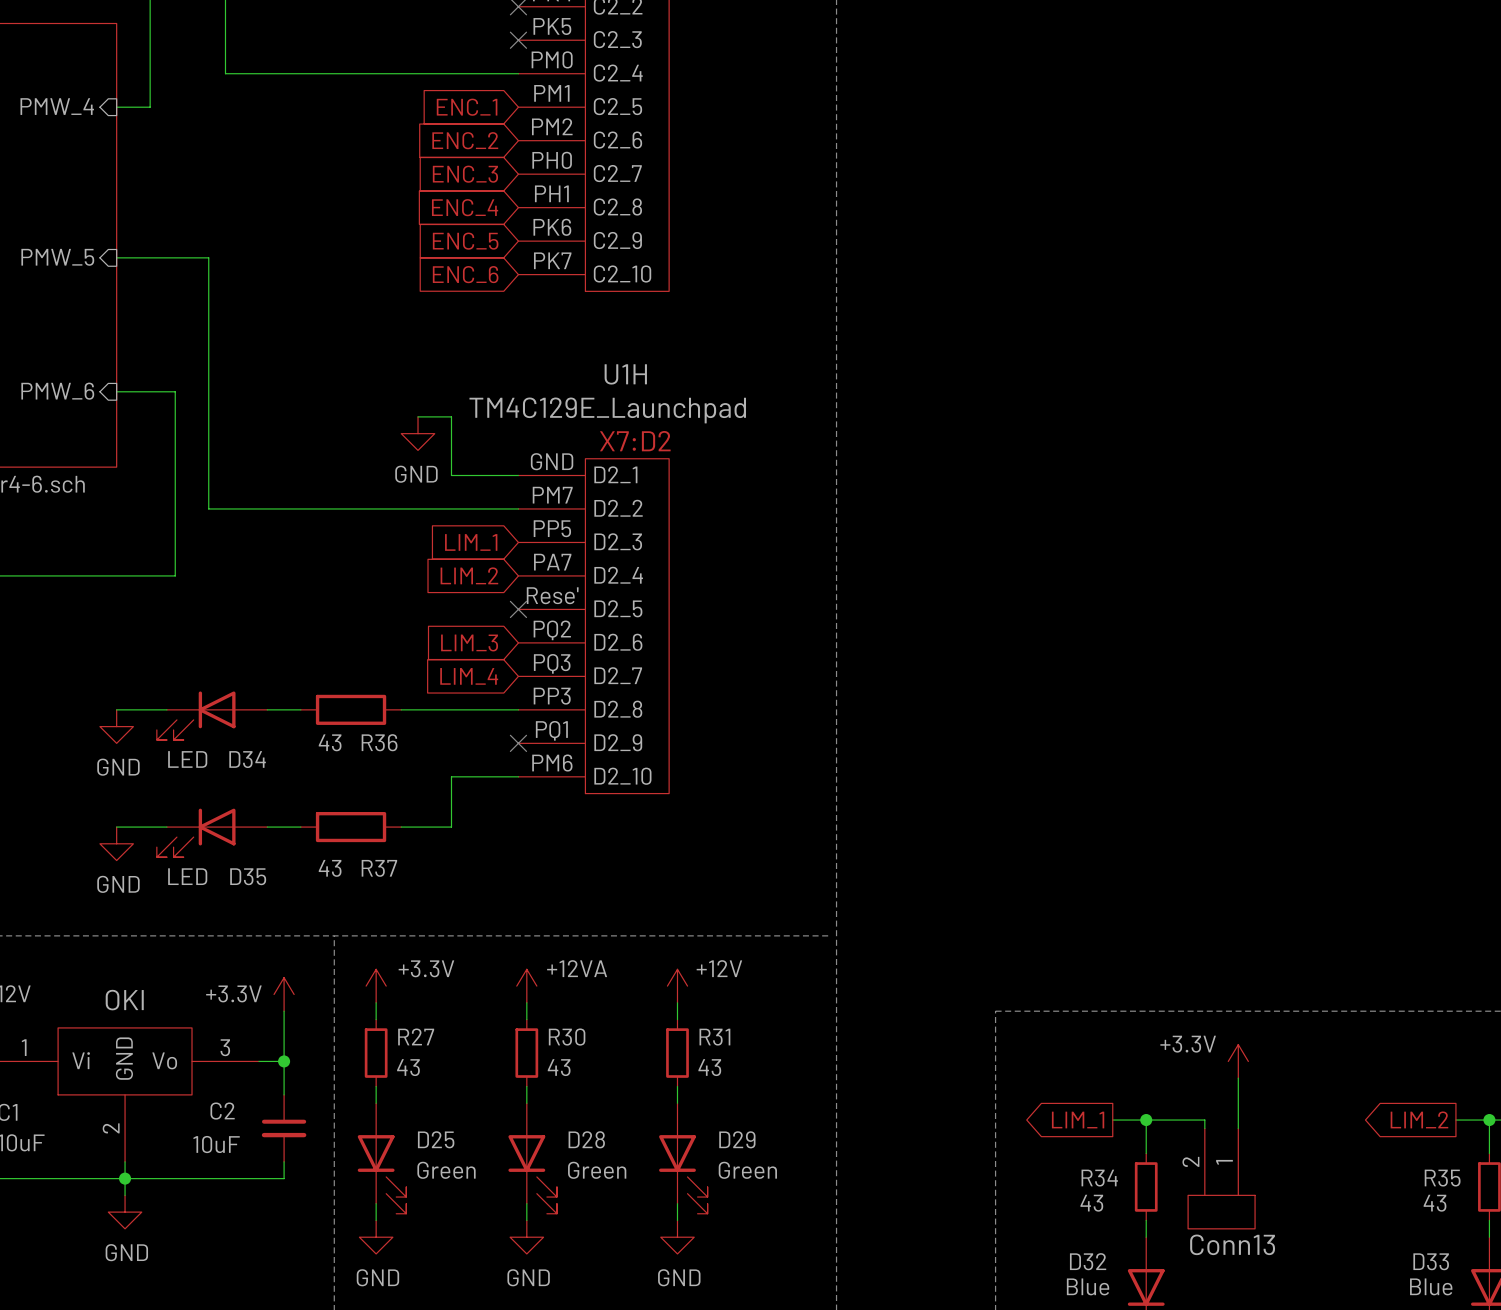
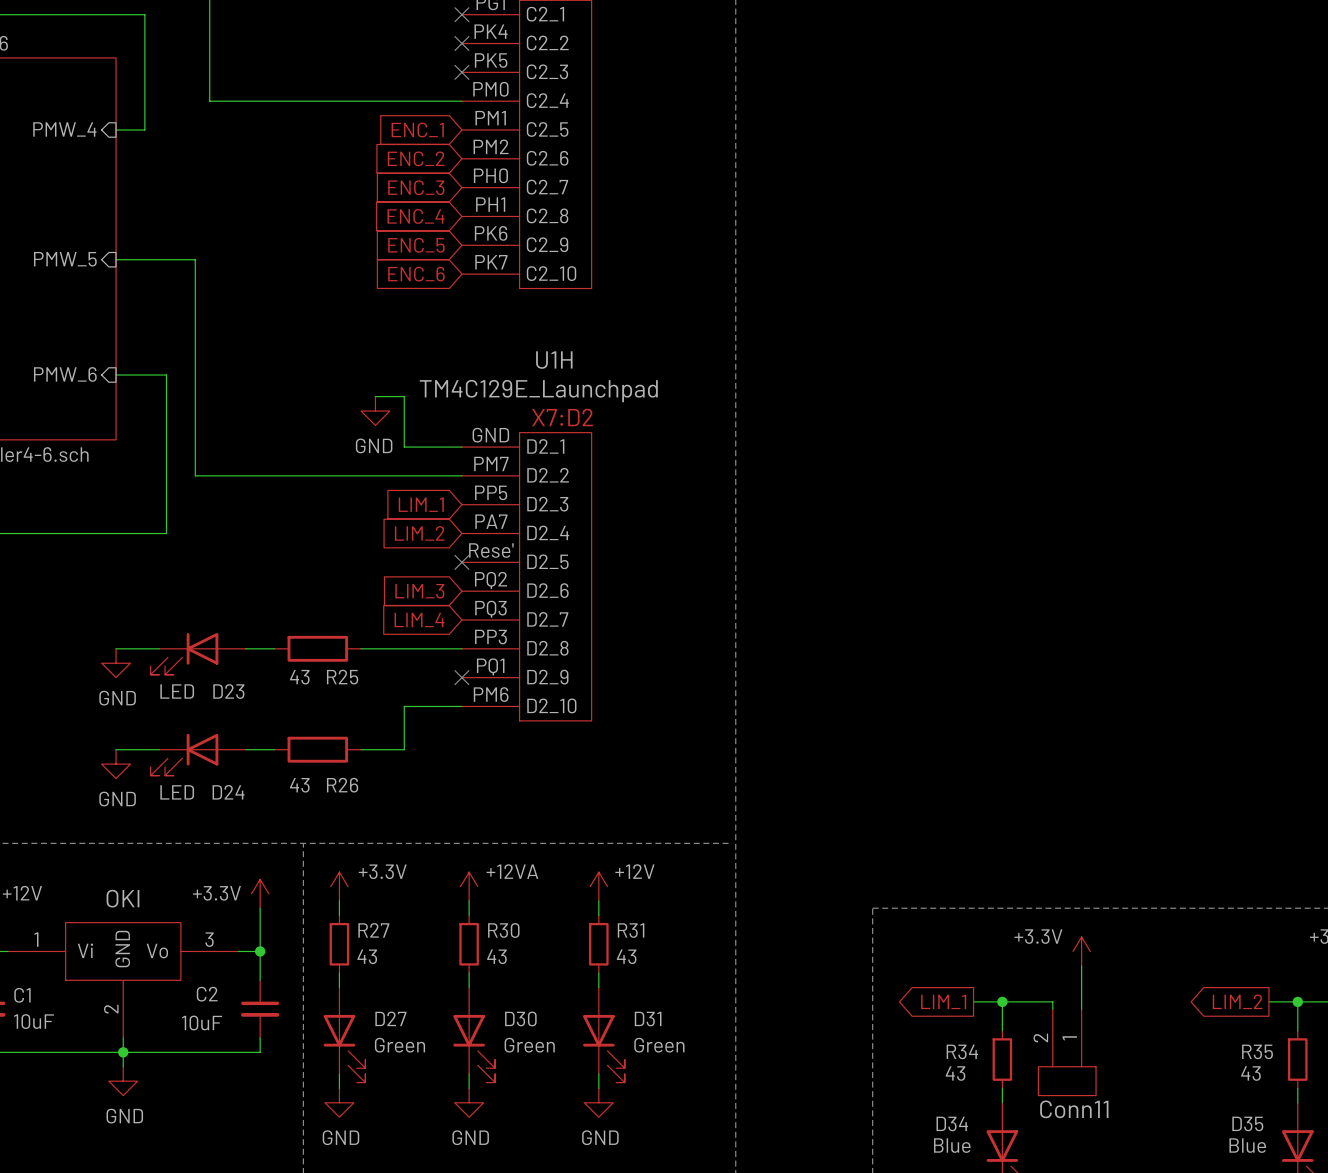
R36 name: R36 (379, 742) -> R25 (342, 677)
D34 name: D34 (247, 759) -> D23 (228, 691)
R37 name: R37 (379, 868) -> R26 (342, 785)
D35 name: D35 (248, 876) -> D24 (228, 792)
D25 name: D25 (436, 1139) -> D27 (390, 1018)
D28 name: D28 (586, 1139) -> D30 (520, 1018)
D29 name: D29 (737, 1139) -> D31 (648, 1019)
Conn13 name: Conn13 (1232, 1244) -> Conn11 (1074, 1109)
D32 name: D32 (1088, 1261) -> D34 (952, 1123)
D33 name: D33 (1431, 1261) -> D35 (1247, 1123)

